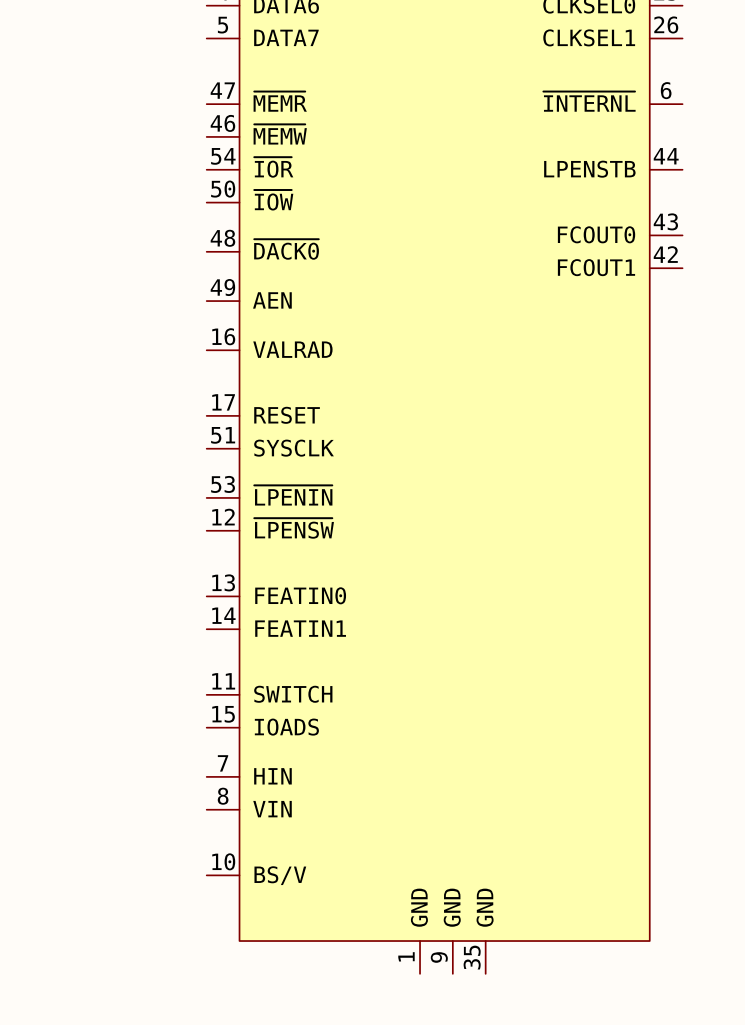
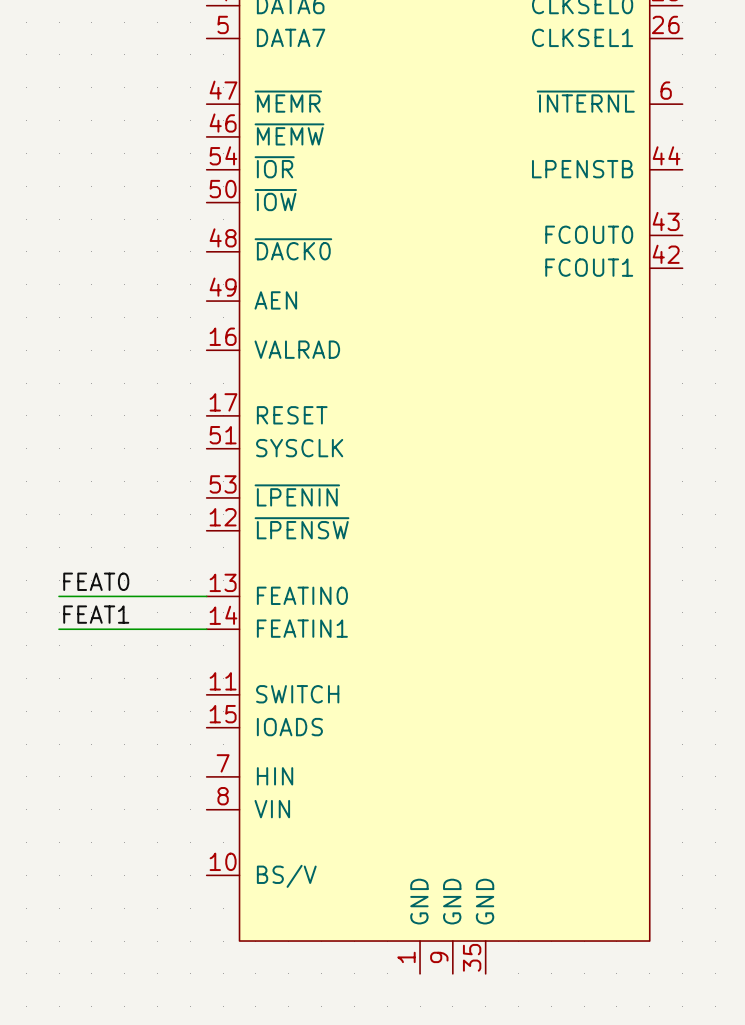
label: none -> FEAT0 (96, 581)
wire: none -> (59, 596) (206, 596)
label: none -> FEAT1 (96, 614)
wire: none -> (59, 629) (206, 629)

